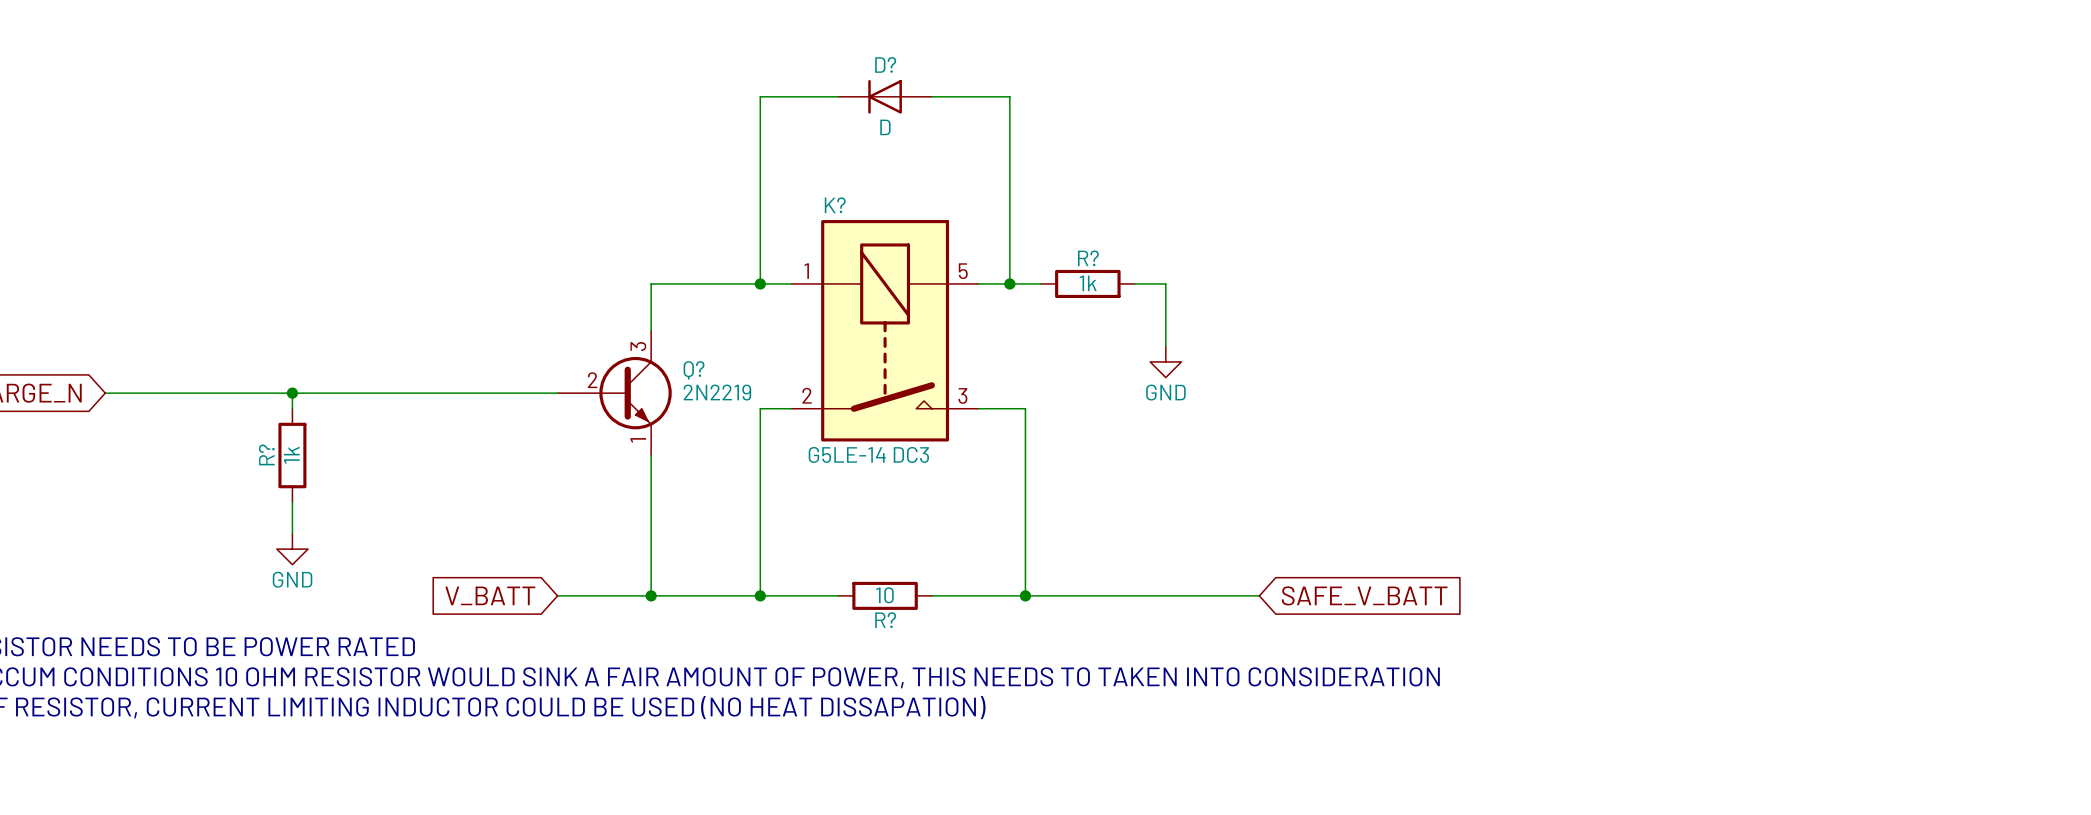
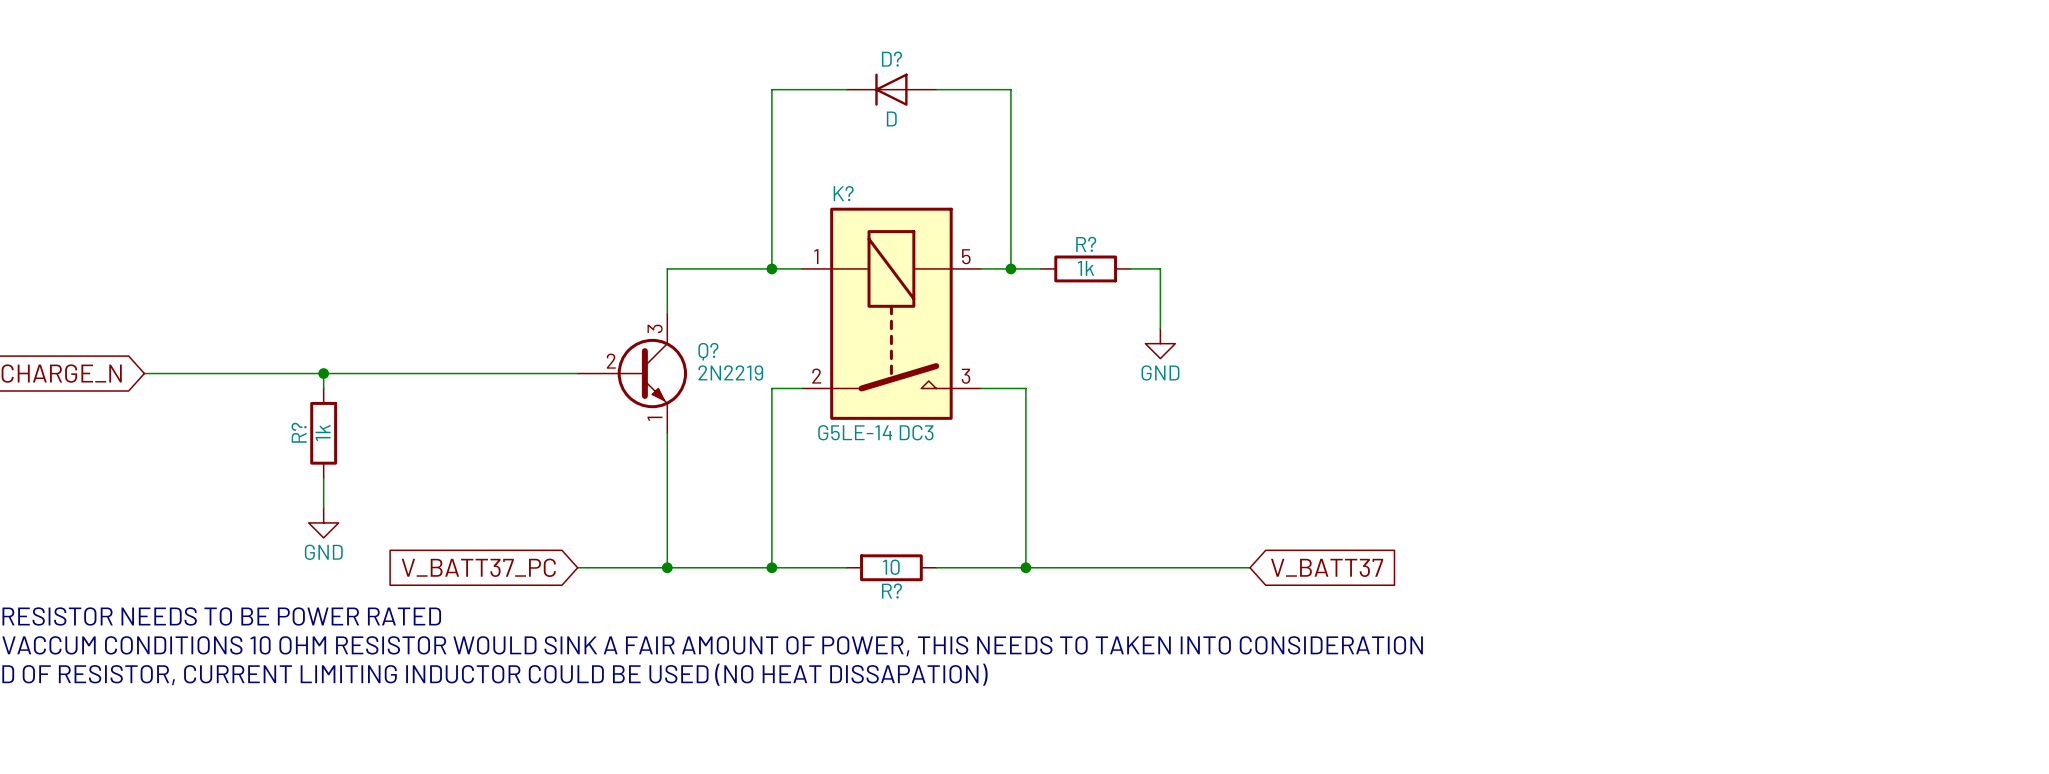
global label: V_BATT (490, 595) -> V_BATT37_PC (478, 567)
global label: SAFE_V_BATT (1364, 595) -> V_BATT37 (1327, 567)

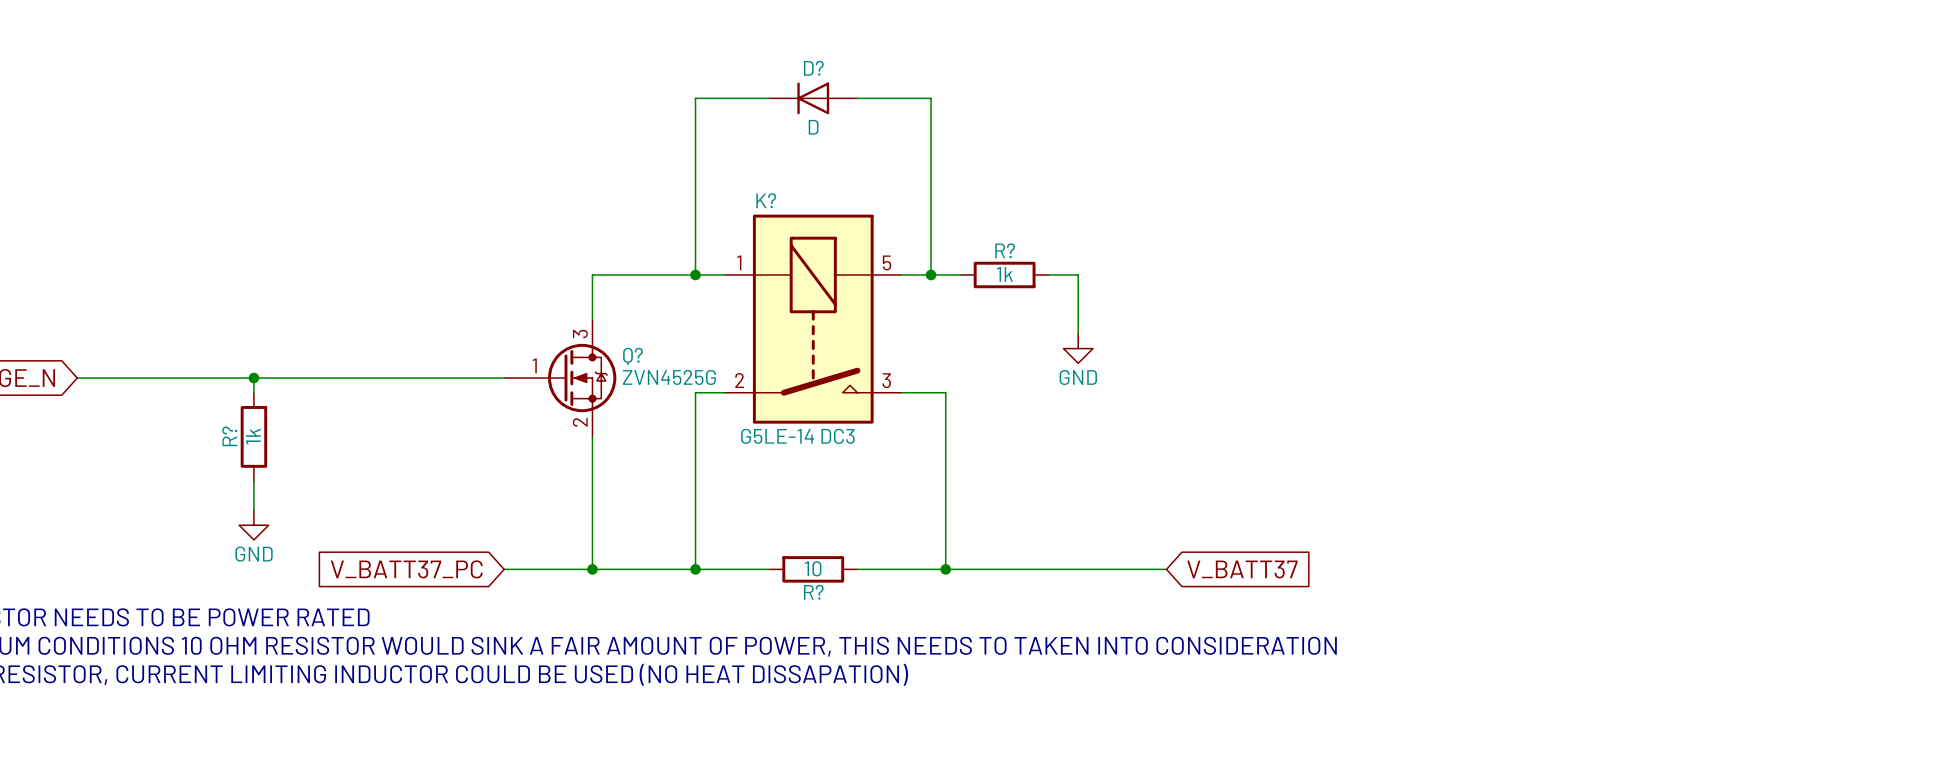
Q? symbol: [577, 313, 688, 434] -> [504, 319, 617, 437]
Q? value: 2N2219 (730, 372) -> ZVN4525G (669, 377)

